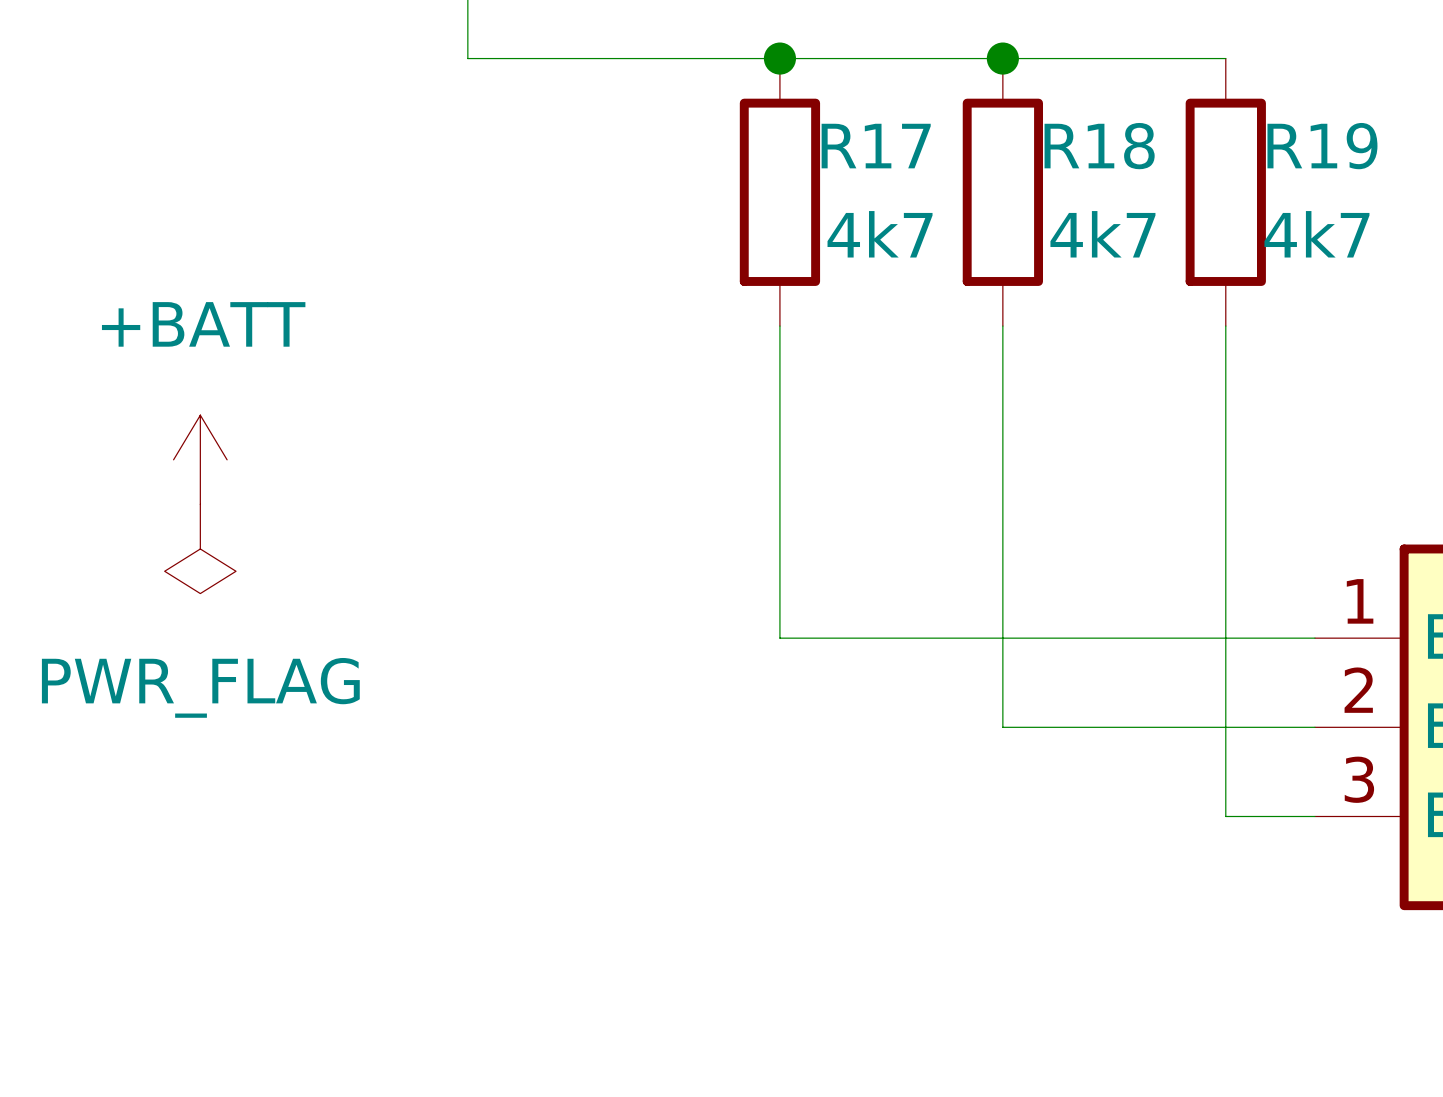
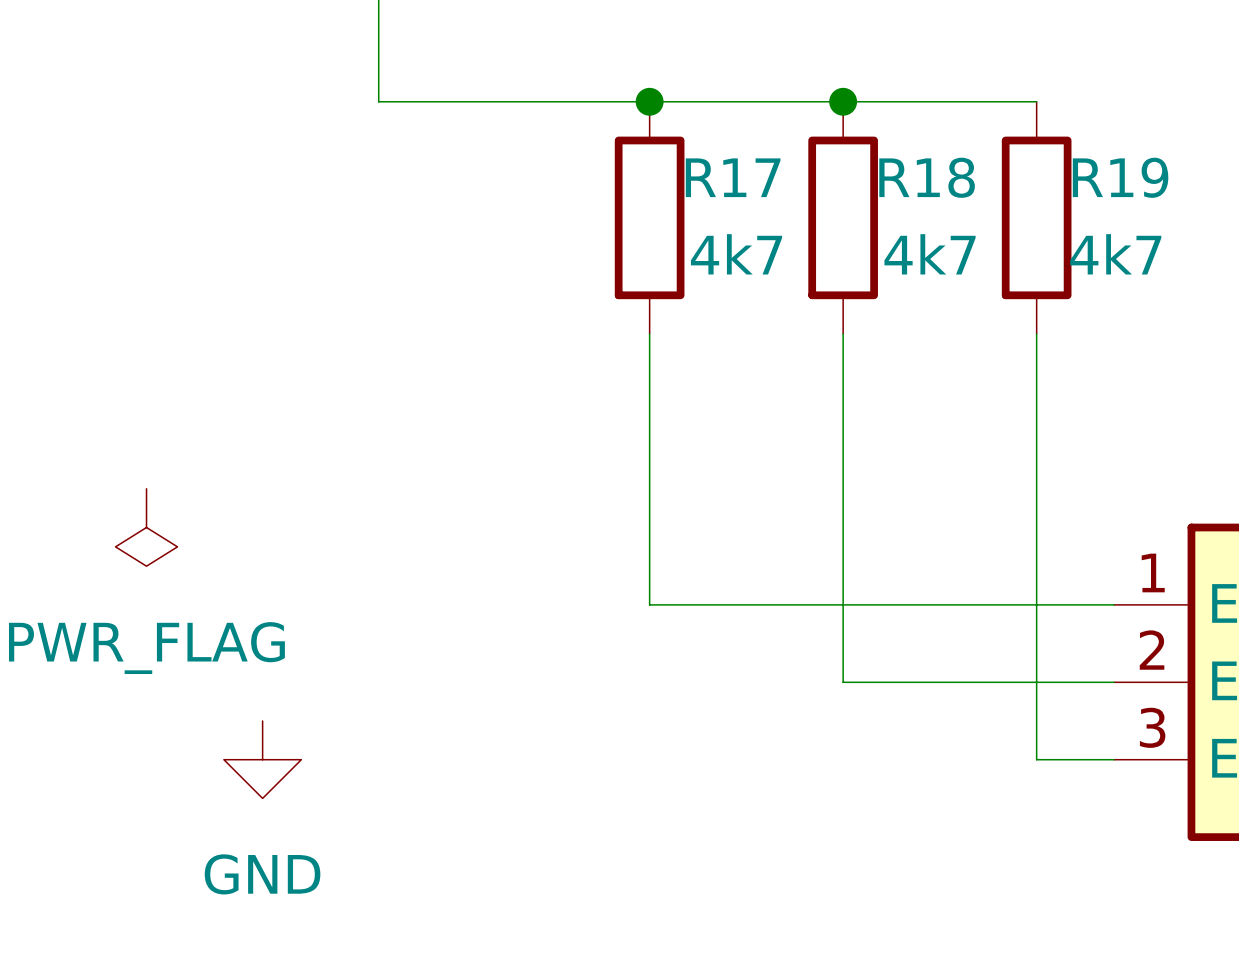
power symbol: +BATT (200, 459) -> none
power symbol: none -> GND (262, 759)

